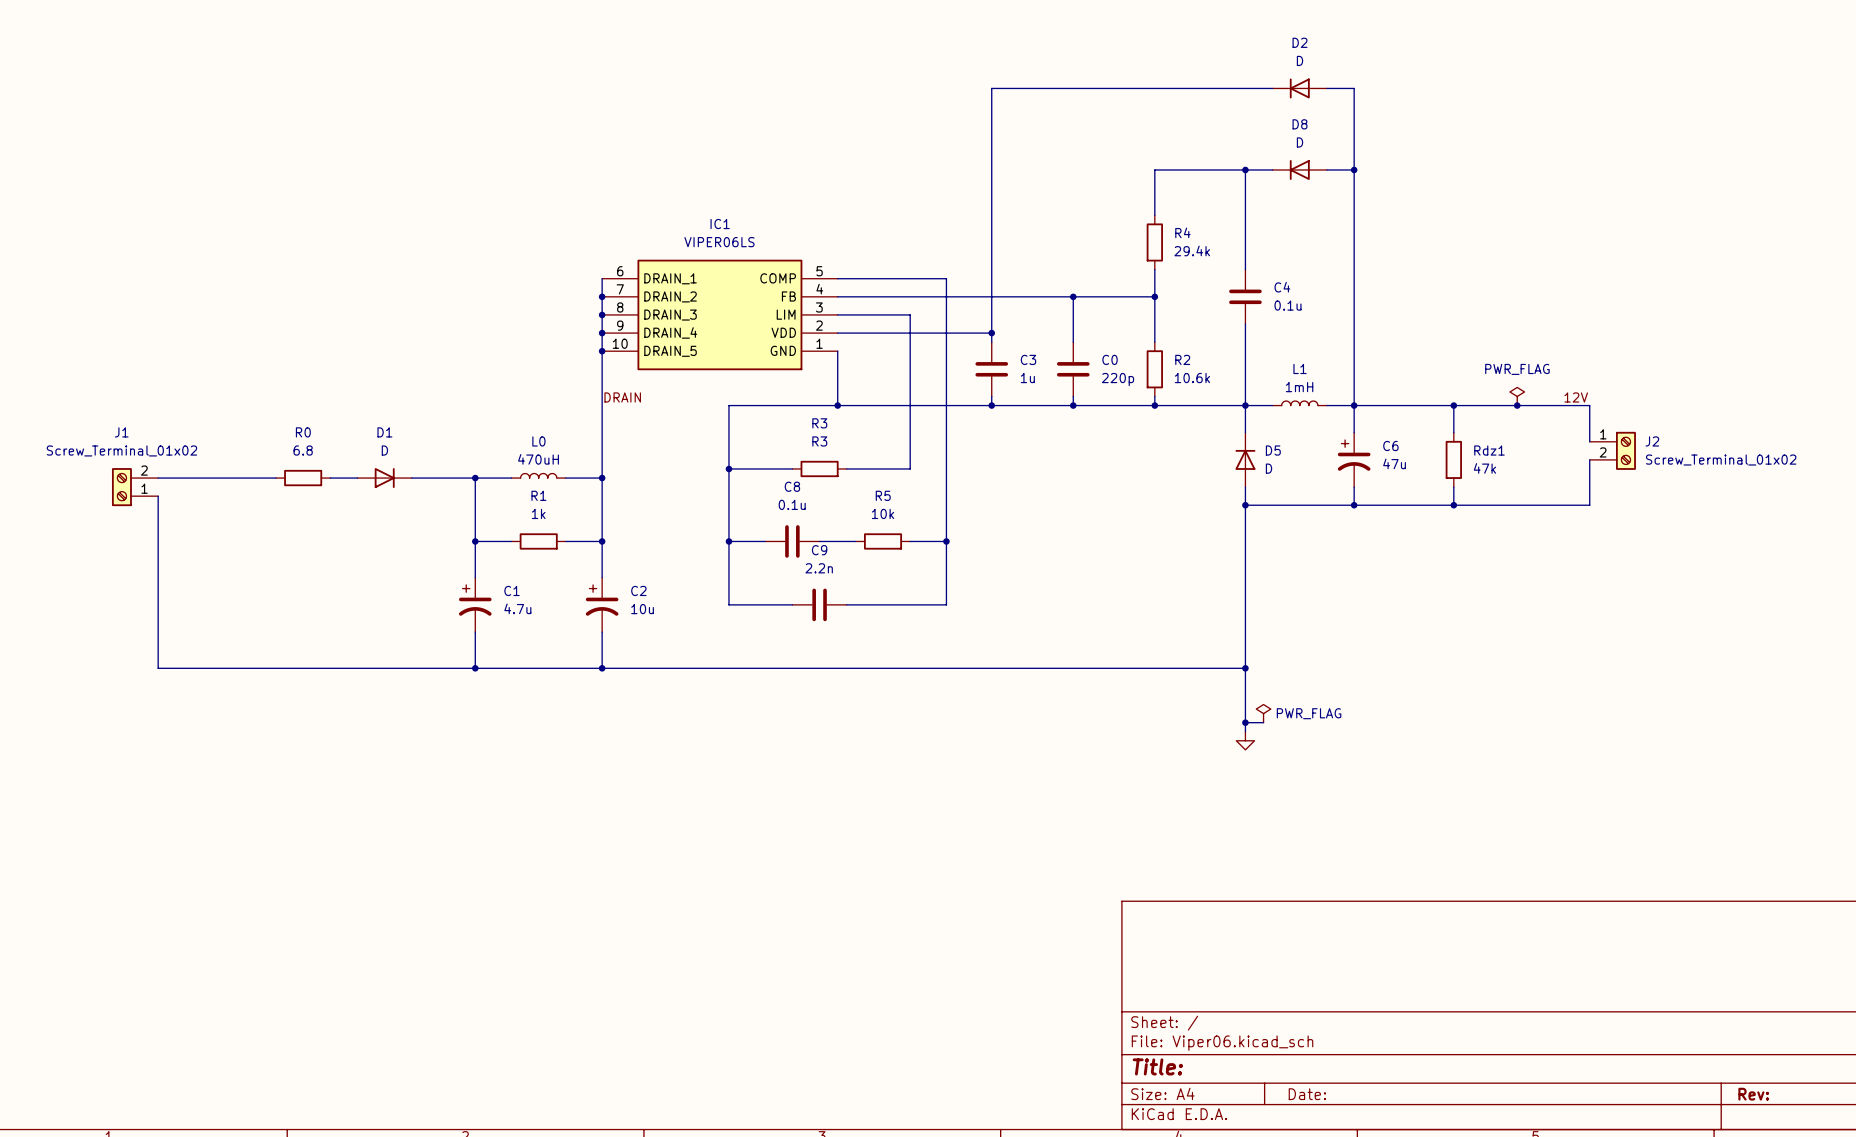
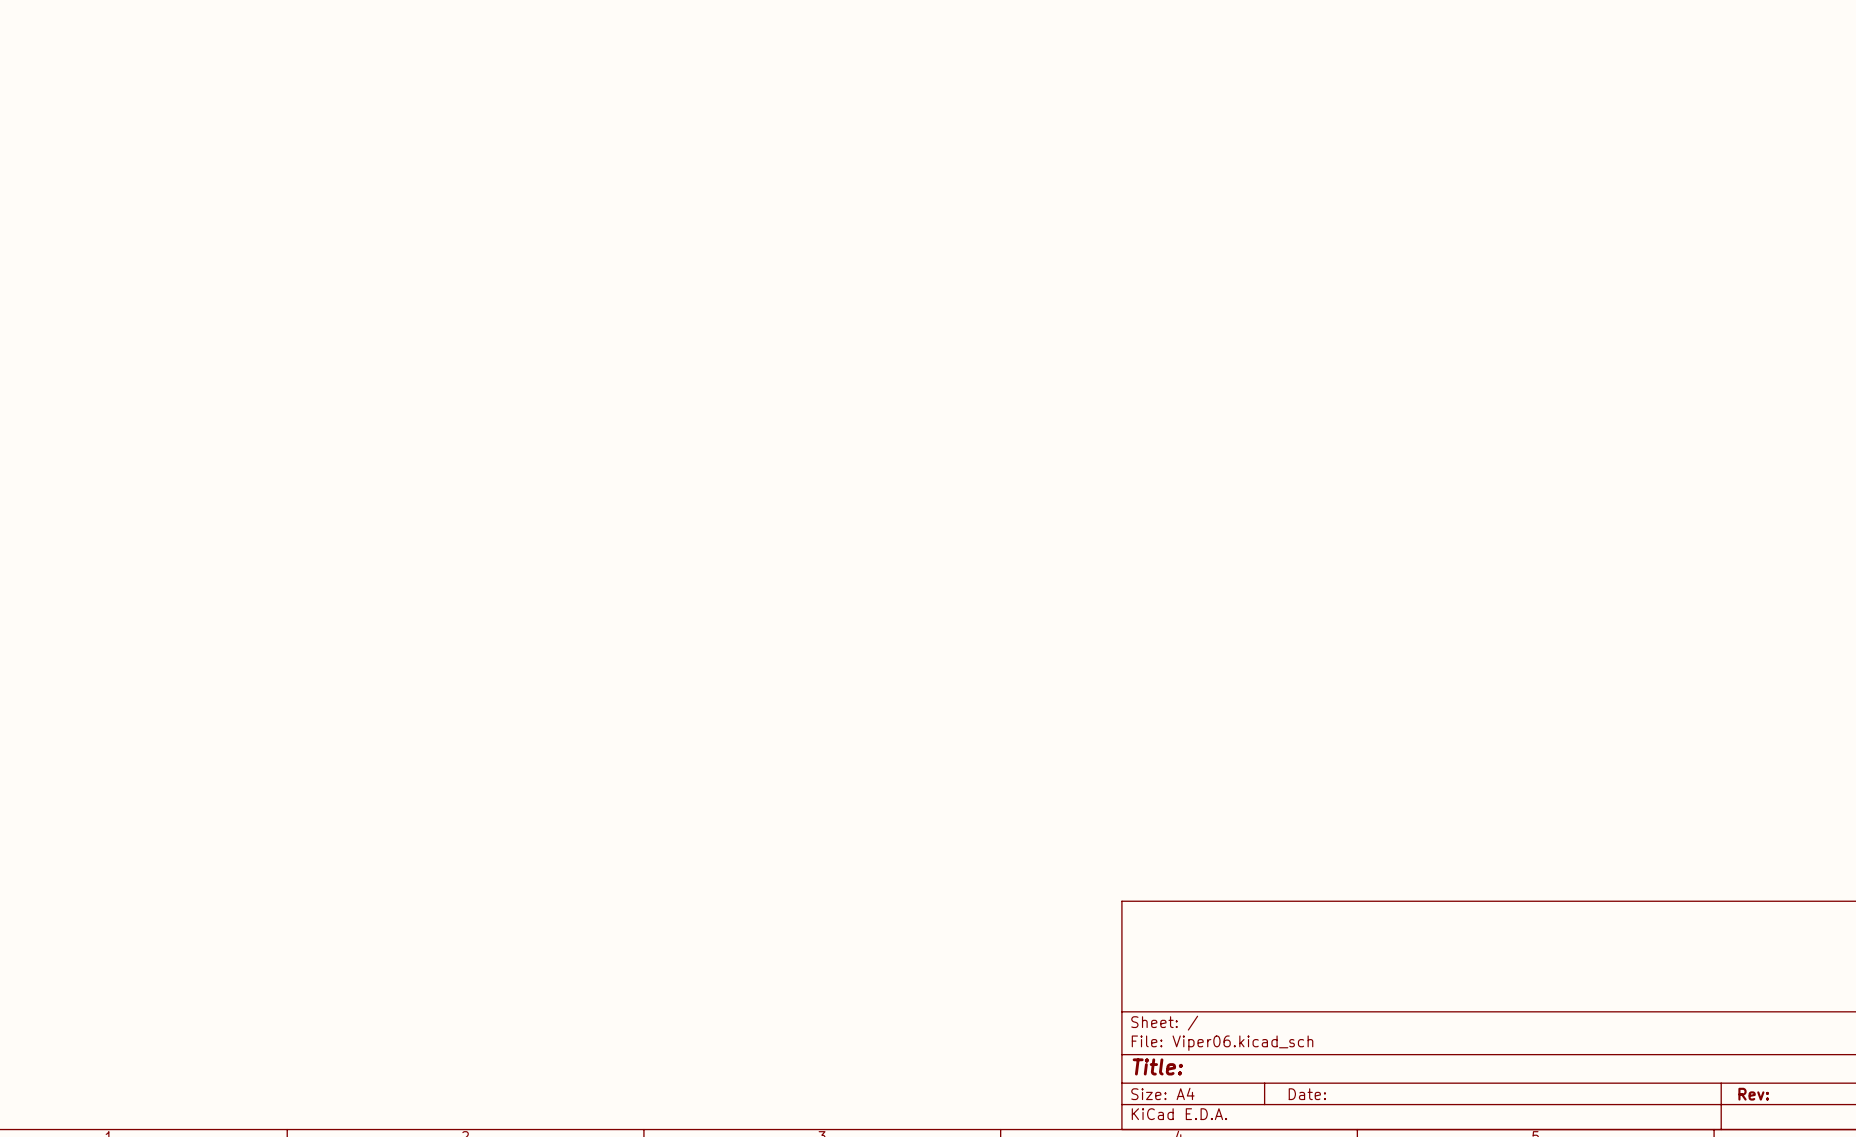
wire: (1272, 88) (991, 88) (991, 342) -> none
D2: D (1299, 88) -> none
wire: (1326, 88) (1354, 88) (1354, 432) -> none
wire: (1245, 169) (1245, 269) -> none
junction: (1245, 169) -> none
wire: (1272, 169) (1154, 169) (1154, 215) -> none
D8: D (1299, 169) -> none
wire: (1326, 169) (1354, 169) -> none
junction: (1354, 169) -> none
R4: 29.4k (1154, 242) -> none
wire: (1154, 269) (1154, 342) -> none
wire: (602, 278) (602, 577) -> none
wire: (837, 278) (946, 278) (946, 604) (846, 604) -> none
junction: (602, 296) -> none
wire: (837, 296) (1154, 296) -> none
wire: (1073, 296) (1073, 342) -> none
junction: (1073, 296) -> none
junction: (1154, 296) -> none
C4: 0.1u (1245, 296) -> none
junction: (602, 314) -> none
IC1: VIPER06LS (719, 314) -> none
wire: (837, 314) (910, 314) (910, 468) (846, 468) -> none
wire: (1245, 324) (1245, 432) -> none
junction: (602, 333) -> none
wire: (837, 333) (991, 333) -> none
junction: (991, 333) -> none
junction: (602, 351) -> none
wire: (837, 351) (837, 405) -> none
C3: 1u (991, 369) -> none
C0: 220p (1073, 369) -> none
R2: 10.6k (1154, 369) -> none
wire: (991, 396) (991, 405) -> none
wire: (1073, 396) (1073, 405) -> none
wire: (1154, 396) (1154, 405) -> none
power symbol: PWR_FLAG (1517, 396) -> none
label: DRAIN (622, 397) -> none
label: 12V (1576, 397) -> none
L1: 1mH (1299, 403) -> none
junction: (837, 405) -> none
junction: (991, 405) -> none
junction: (1073, 405) -> none
junction: (1154, 405) -> none
junction: (1245, 405) -> none
wire: (1272, 405) (728, 405) (728, 604) (792, 604) -> none
wire: (1326, 405) (1589, 405) (1589, 441) -> none
junction: (1354, 405) -> none
wire: (1453, 405) (1453, 432) -> none
junction: (1453, 405) -> none
junction: (1517, 405) -> none
J2: Screw_Terminal_01x02 (1612, 450) -> none
D5: D (1245, 459) -> none
C6: 47u (1354, 459) -> none
Rdz1: 47k (1453, 459) -> none
wire: (1589, 459) (1589, 505) (1245, 505) -> none
wire: (728, 468) (792, 468) -> none
junction: (728, 468) -> none
R3: R3 (819, 468) -> none
L0: 470uH (538, 475) -> none
wire: (158, 478) (275, 478) -> none
R0: 6.8 (303, 478) -> none
wire: (330, 478) (357, 478) -> none
D1: D (384, 478) -> none
wire: (411, 478) (511, 478) -> none
wire: (475, 478) (475, 577) -> none
junction: (475, 478) -> none
wire: (565, 478) (602, 478) -> none
junction: (602, 478) -> none
J1: Screw_Terminal_01x02 (135, 487) -> none
wire: (1245, 487) (1245, 731) -> none
wire: (1354, 487) (1354, 505) -> none
wire: (1453, 487) (1453, 505) -> none
wire: (158, 496) (158, 668) (1245, 668) -> none
junction: (1245, 505) -> none
junction: (1354, 505) -> none
junction: (1453, 505) -> none
wire: (475, 541) (511, 541) -> none
junction: (475, 541) -> none
R1: 1k (538, 541) -> none
wire: (565, 541) (602, 541) -> none
junction: (602, 541) -> none
wire: (728, 541) (765, 541) -> none
junction: (728, 541) -> none
C8: 0.1u (792, 541) -> none
wire: (819, 541) (855, 541) -> none
R5: 10k (883, 541) -> none
wire: (910, 541) (946, 541) -> none
junction: (946, 541) -> none
C1: 4.7u (475, 604) -> none
C2: 10u (602, 604) -> none
C9: 2.2n (819, 604) -> none
wire: (475, 632) (475, 668) -> none
wire: (602, 632) (602, 668) -> none
junction: (475, 668) -> none
junction: (602, 668) -> none
junction: (1245, 668) -> none
power symbol: PWR_FLAG (1263, 713) -> none
wire: (1245, 722) (1263, 722) -> none
junction: (1245, 722) -> none
power symbol: (1245, 740) -> none

